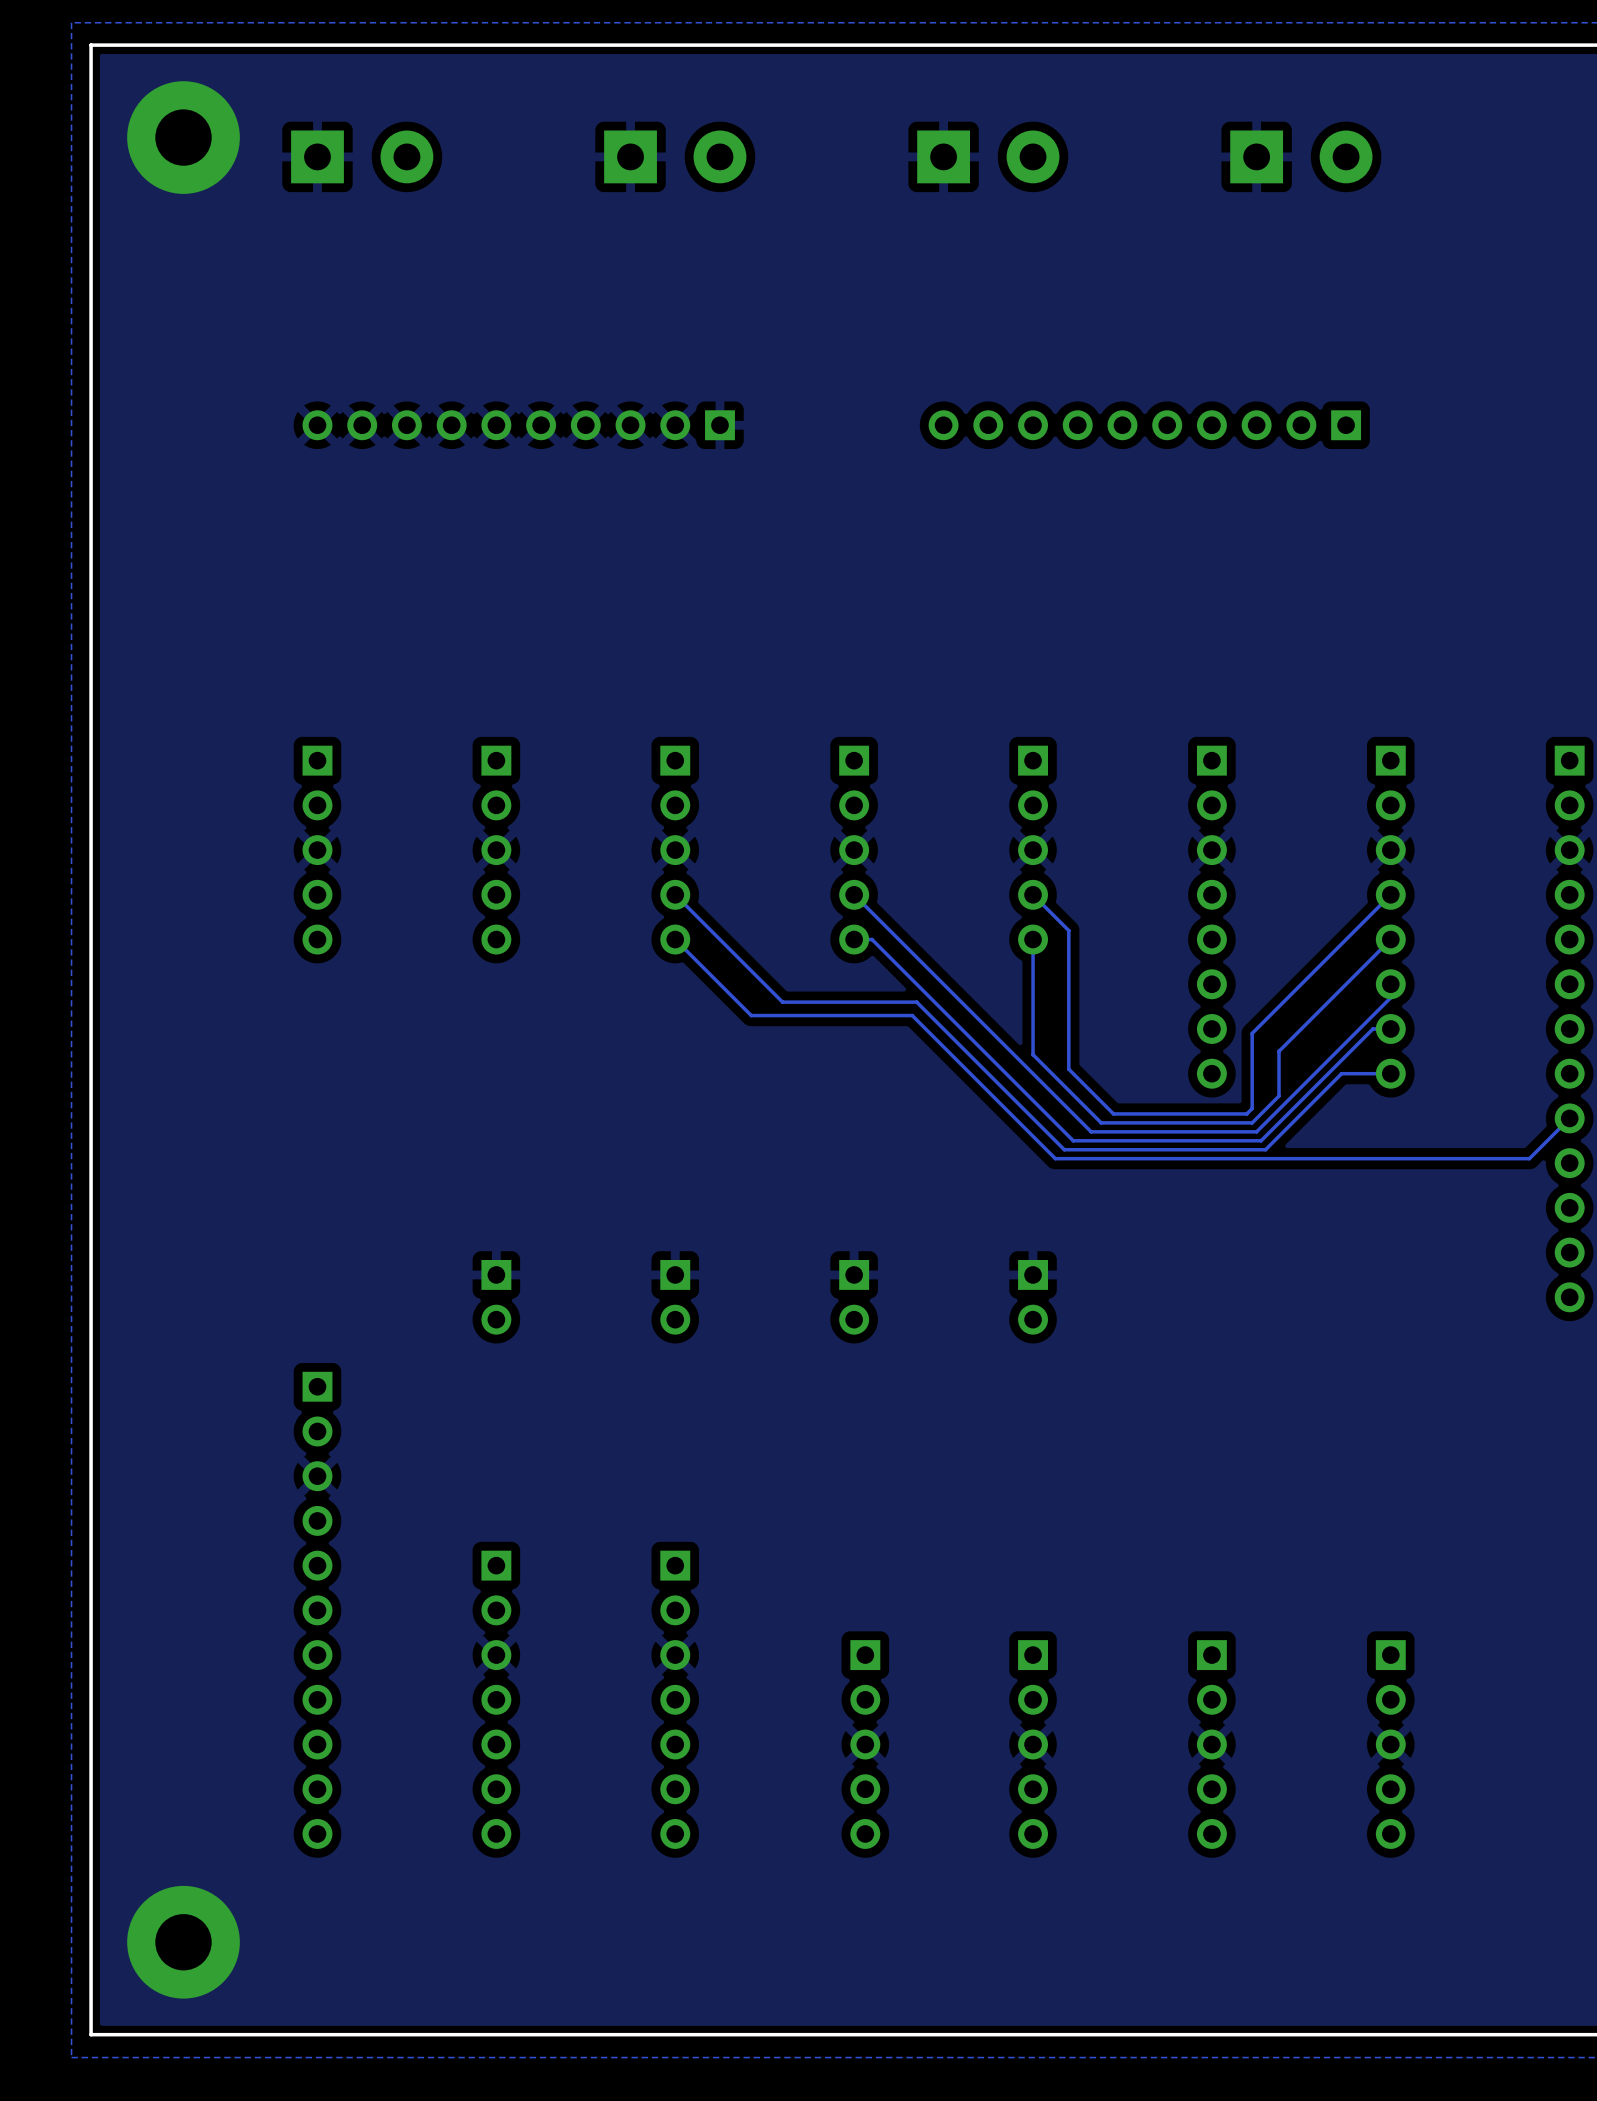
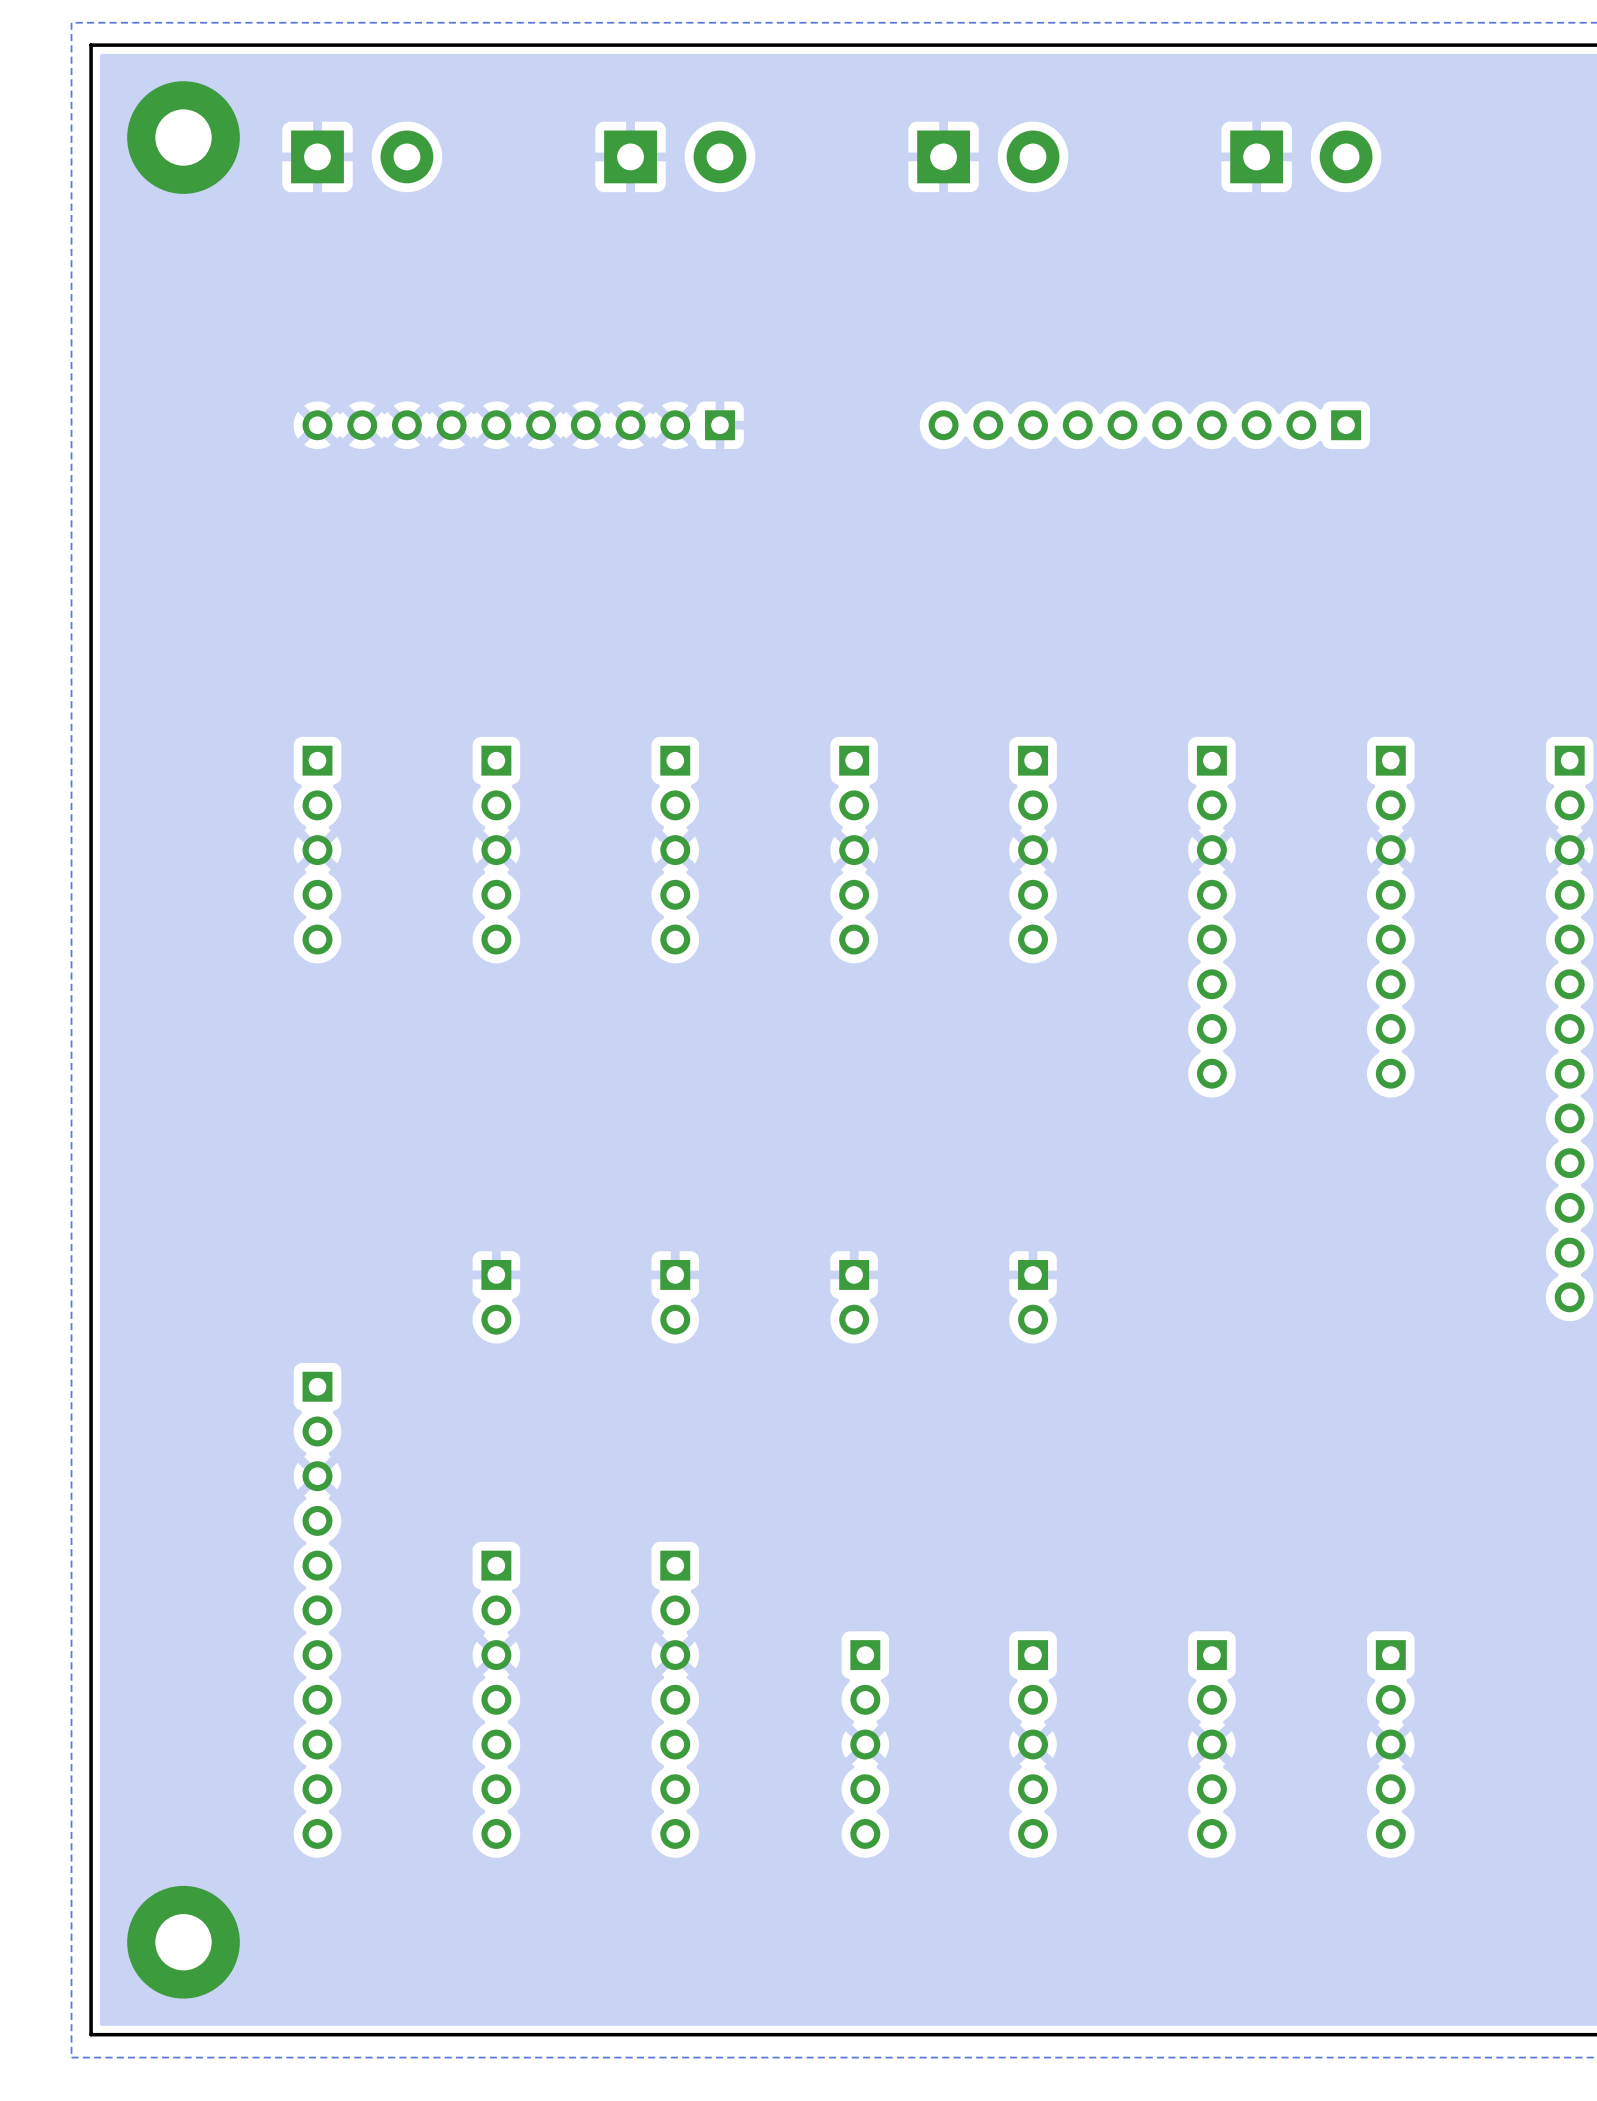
track: (675, 894) (782, 1002) (916, 1002) (1064, 1149) (1265, 1149) (1341, 1073) (1390, 1073) -> none
track: (854, 894) (1091, 1131) (1256, 1131) (1390, 997) (1390, 984) -> none
track: (1390, 894) (1252, 1033) (1252, 1108) (1246, 1113) (1113, 1113) (1068, 1069) (1068, 930) (1033, 894) -> none
track: (675, 939) (751, 1015) (912, 1015) (1055, 1158) (1529, 1158) (1569, 1118) -> none
track: (854, 939) (872, 939) (1073, 1140) (1261, 1140) (1372, 1028) (1390, 1028) -> none
track: (1390, 939) (1279, 1051) (1279, 1096) (1252, 1122) (1101, 1122) (1033, 1054) (1033, 939) -> none

